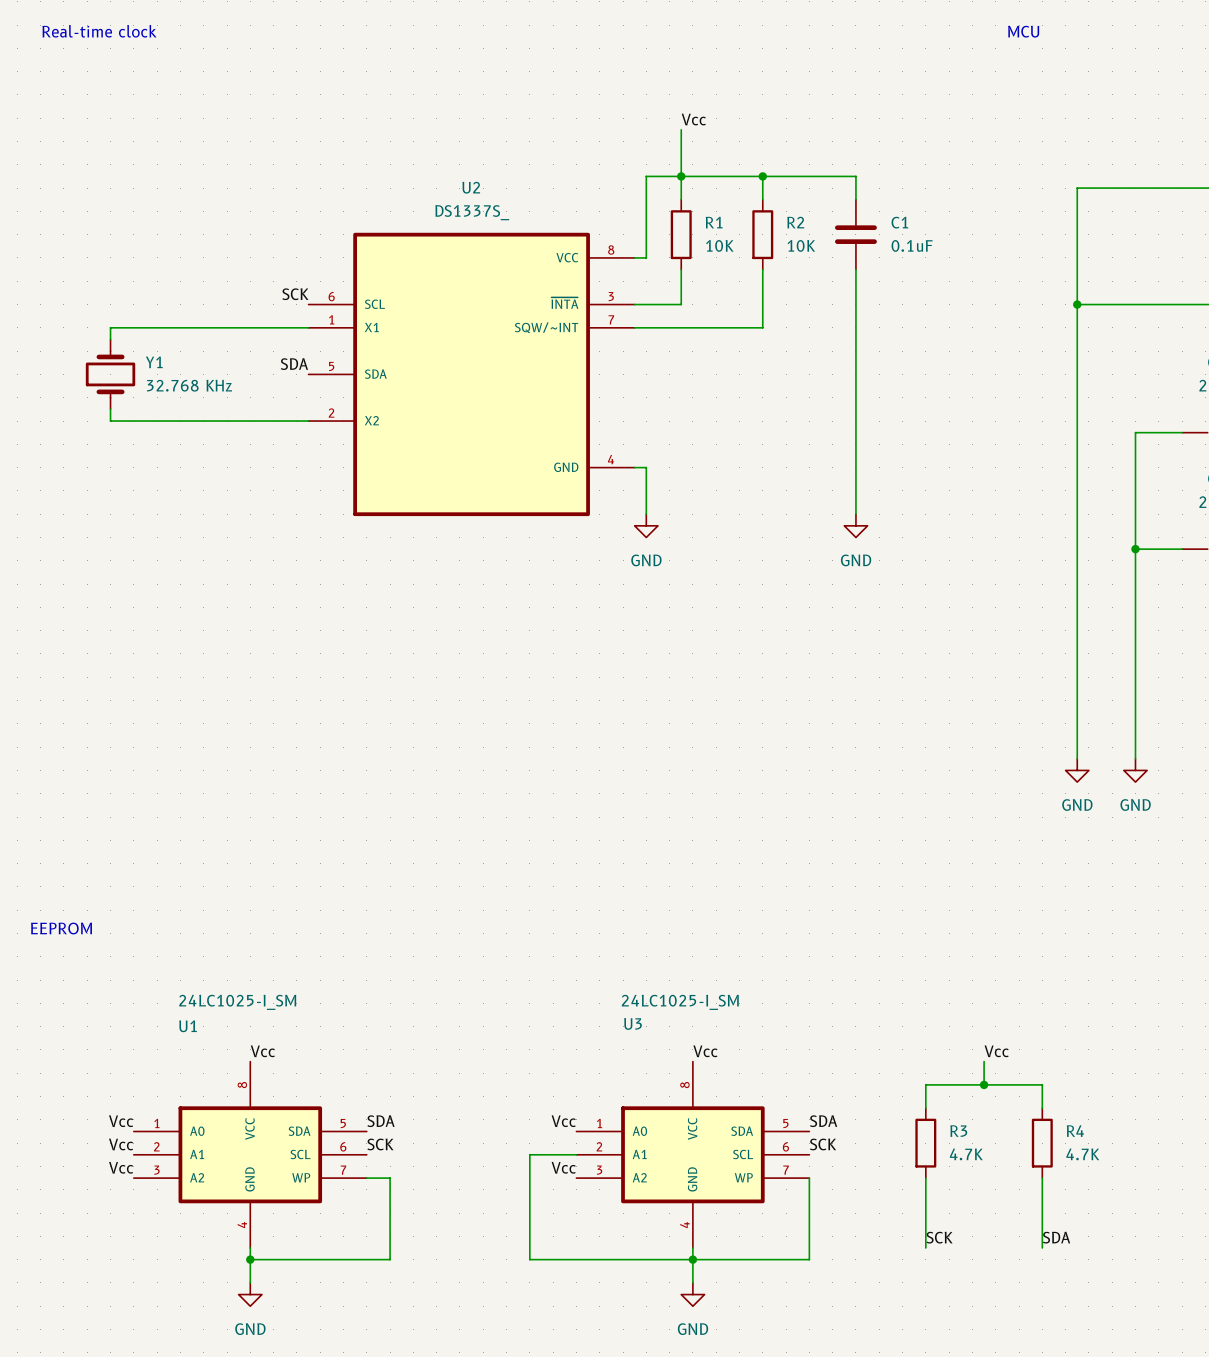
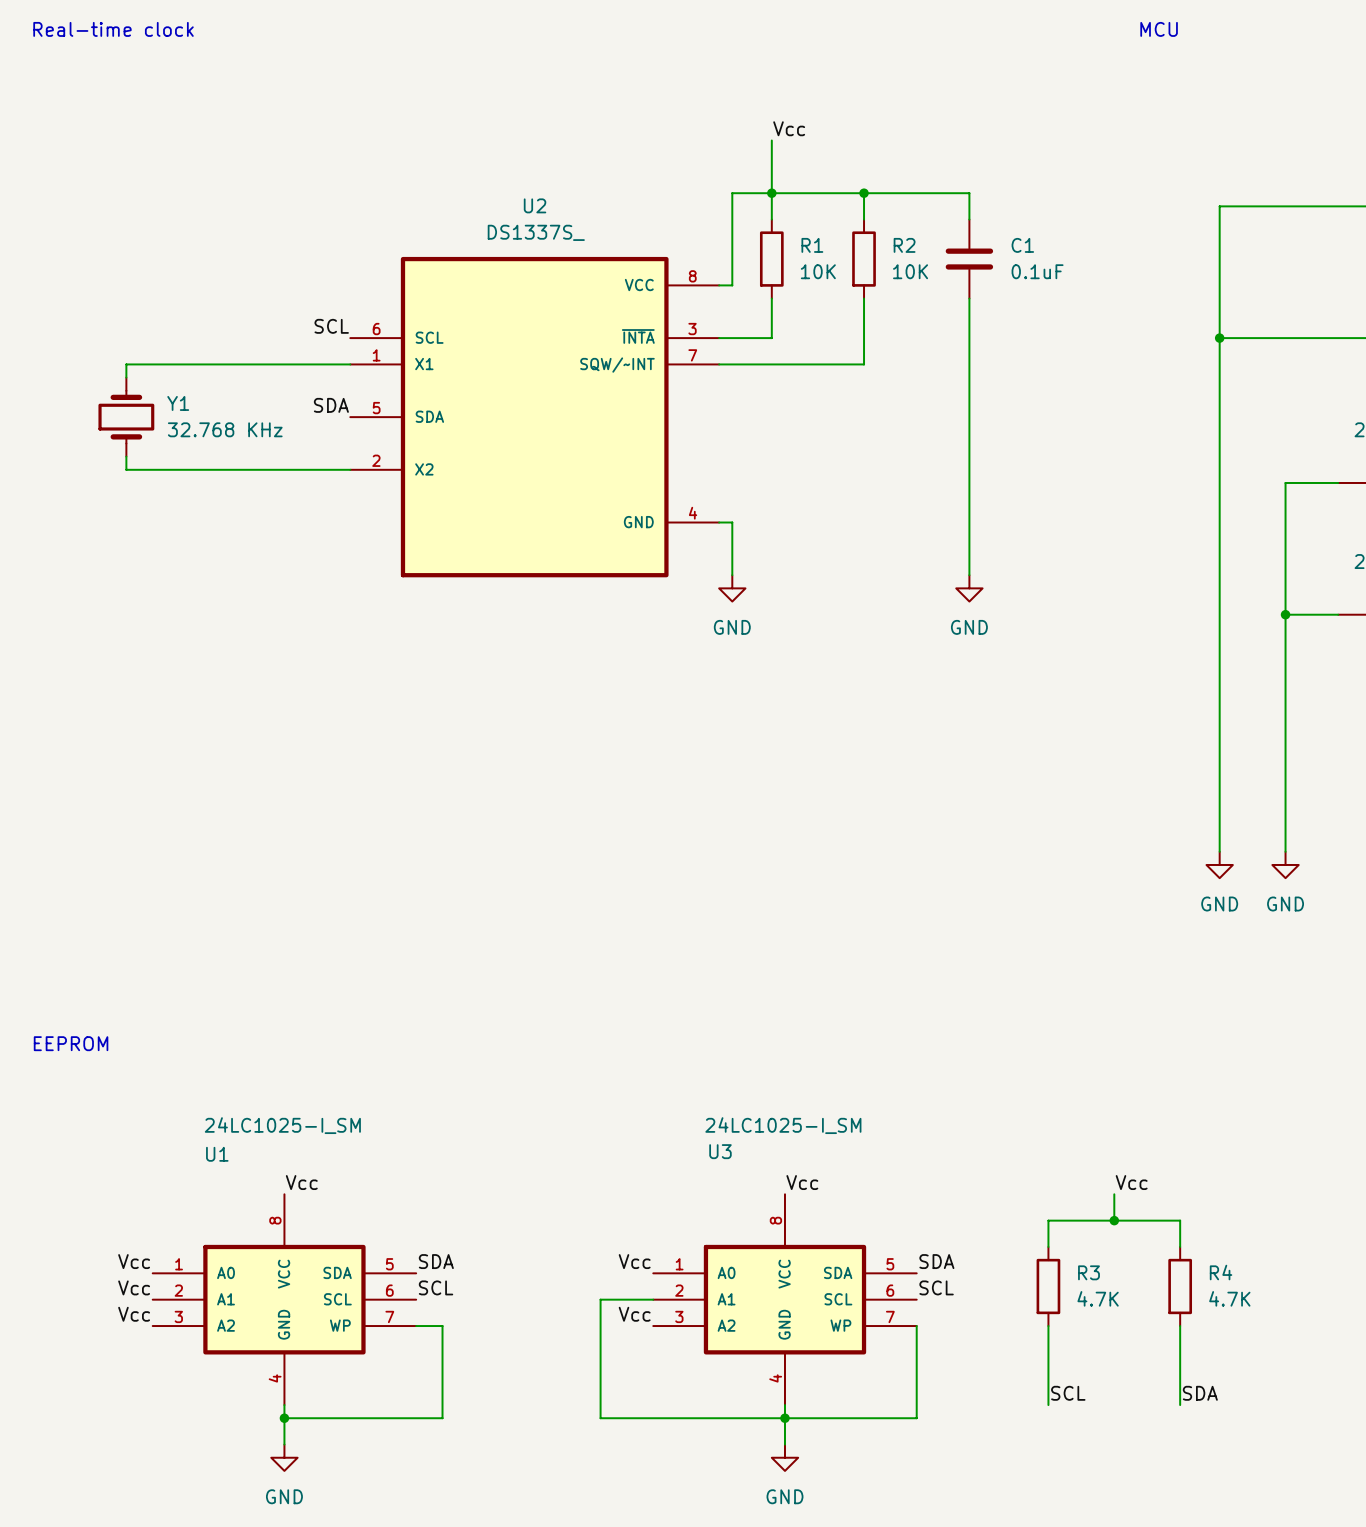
label: SCK (295, 294) -> SCL (331, 326)
label: SCK (380, 1144) -> SCL (436, 1287)
label: SCK (823, 1144) -> SCL (936, 1287)
label: SCK (939, 1237) -> SCL (1068, 1393)

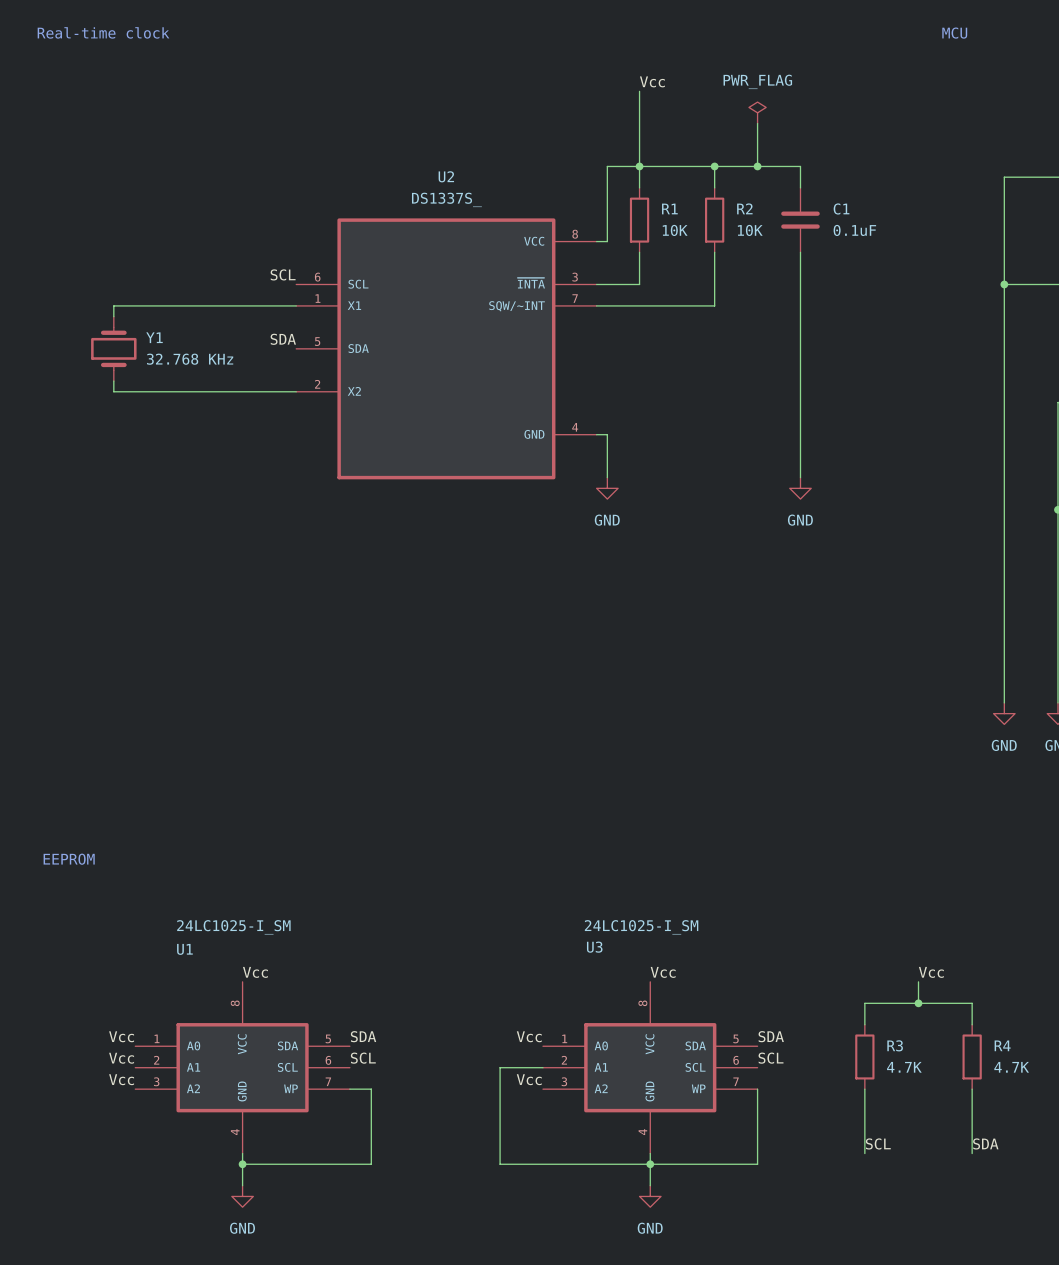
wire: none -> (639, 91) (639, 123)
power symbol: none -> PWR_FLAG (757, 112)
label position: Vcc (789, 128) -> Vcc (652, 81)
wire: none -> (757, 123) (757, 166)
junction: none -> (757, 166)

